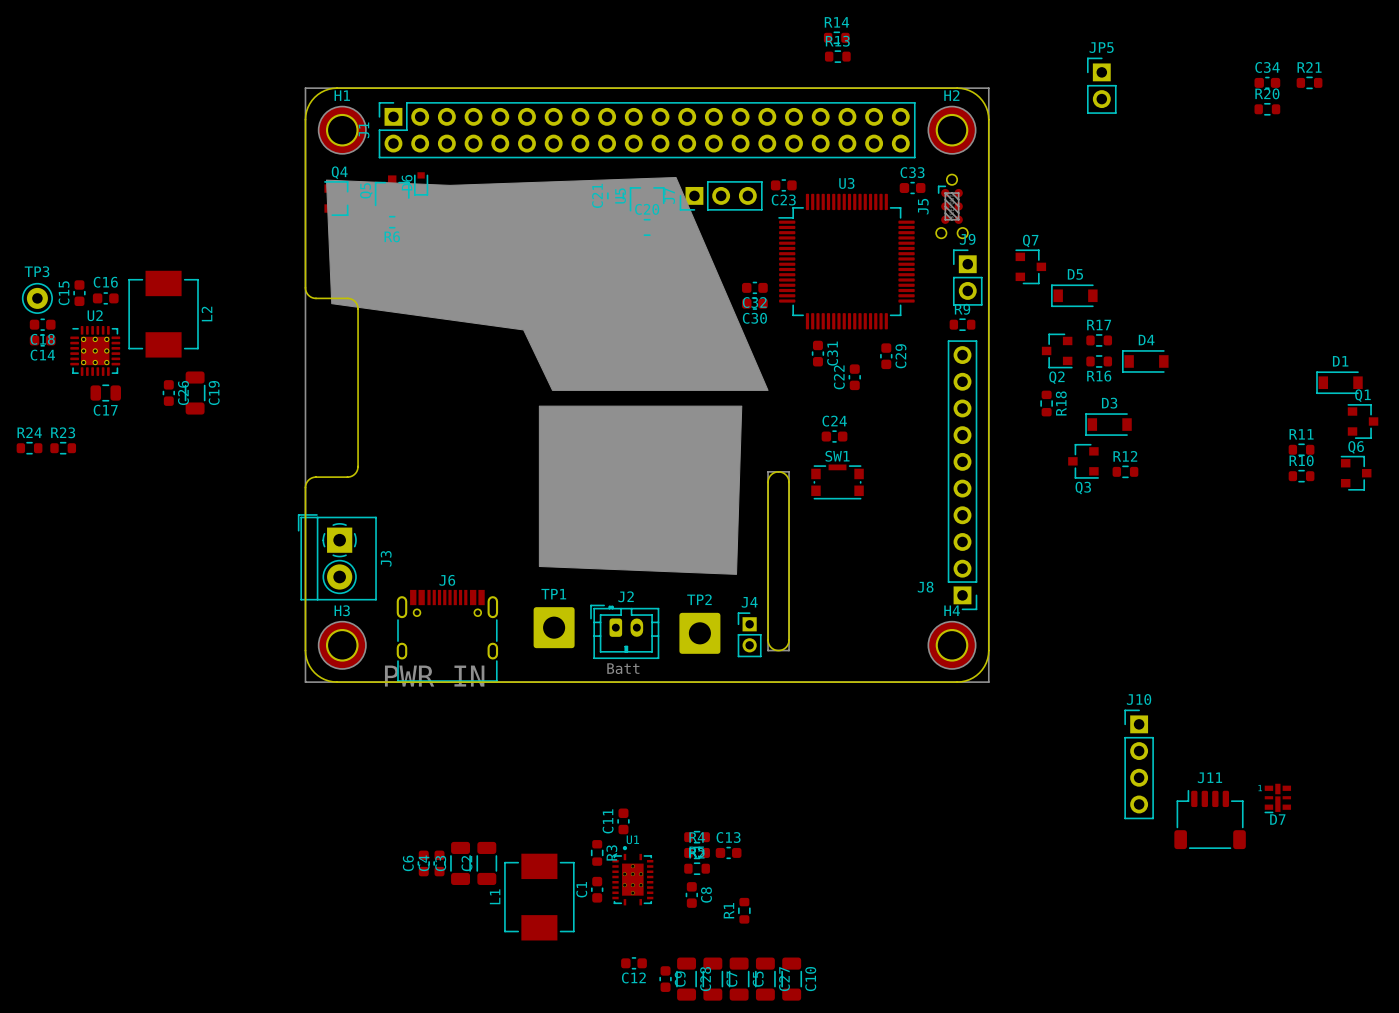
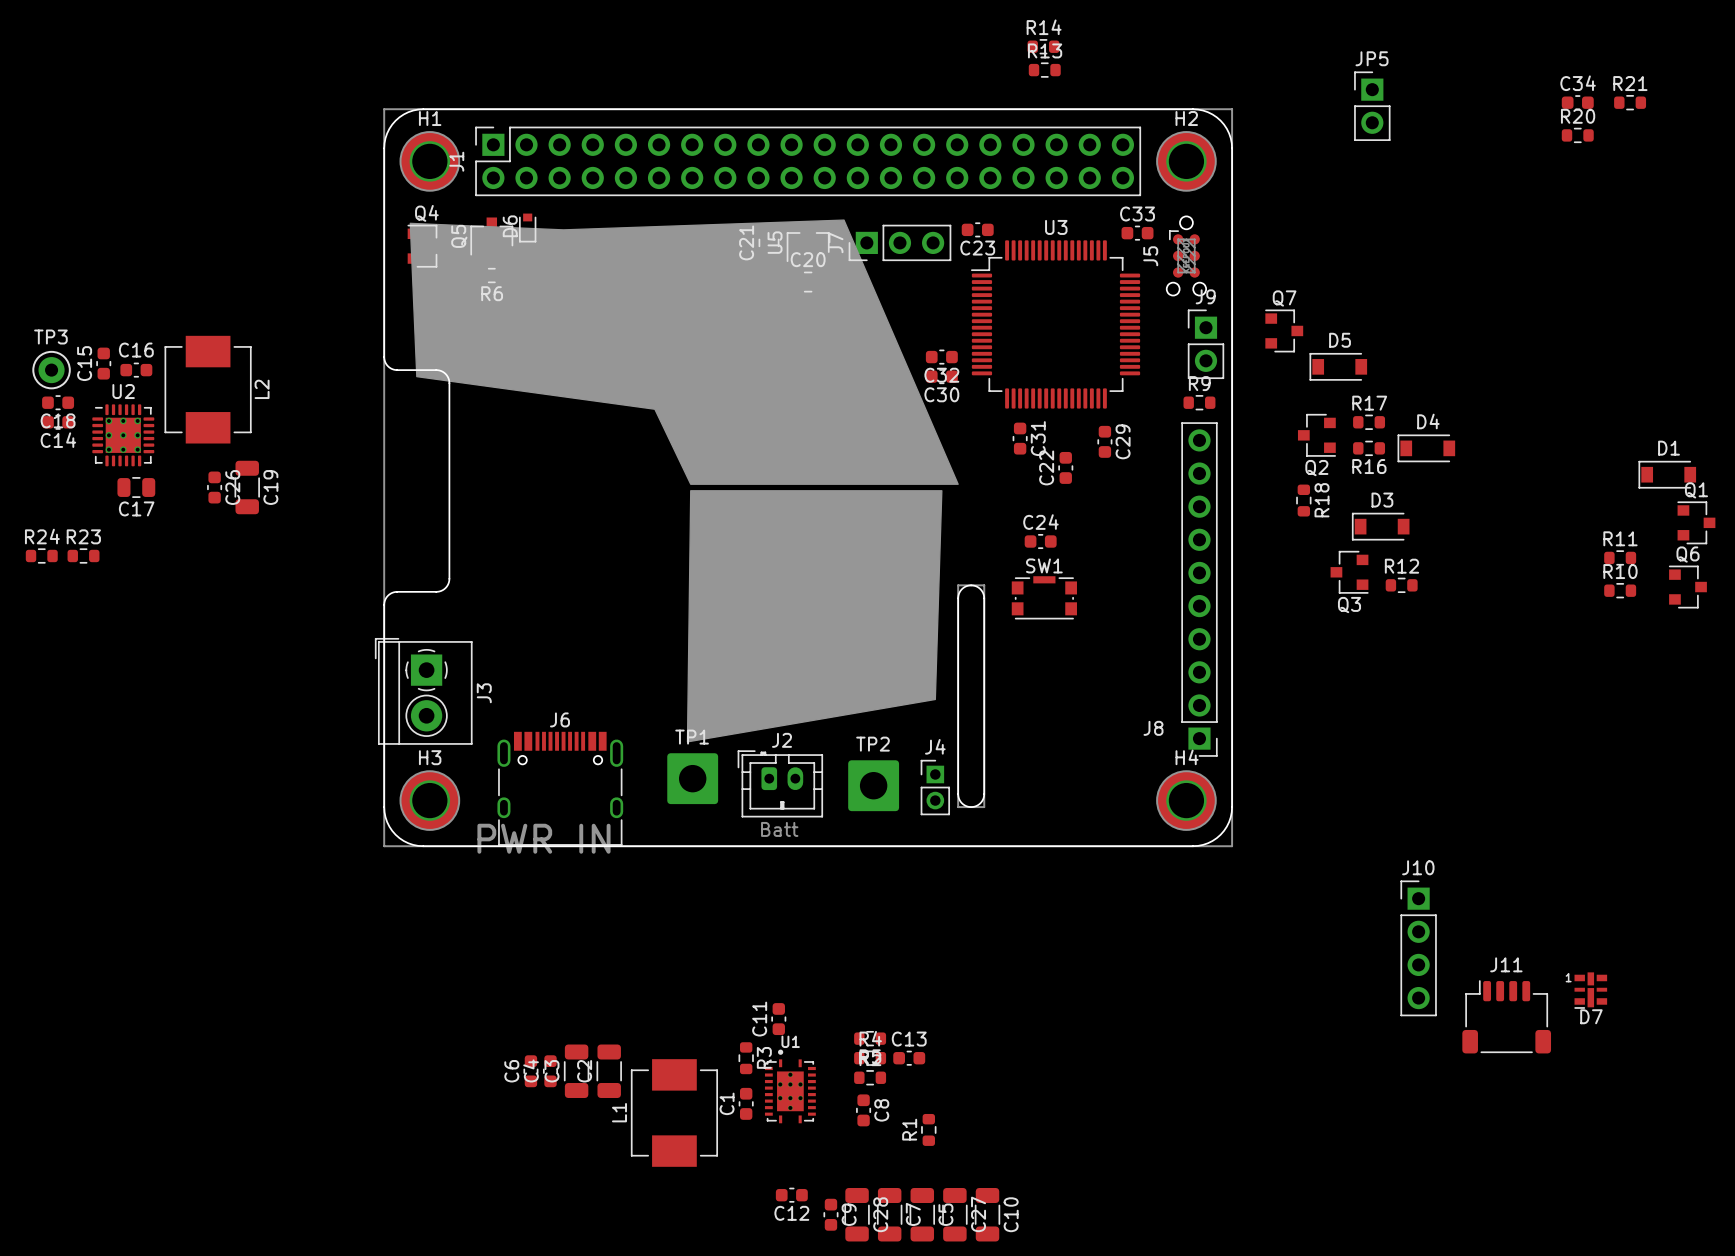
drawing: none -> [686, 490, 943, 743]
drawing: [538, 405, 743, 575] -> none

